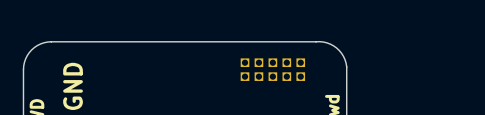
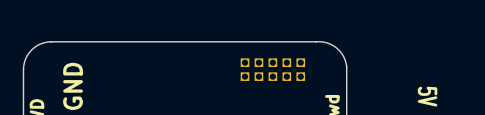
text: none -> 5V (427, 96)

